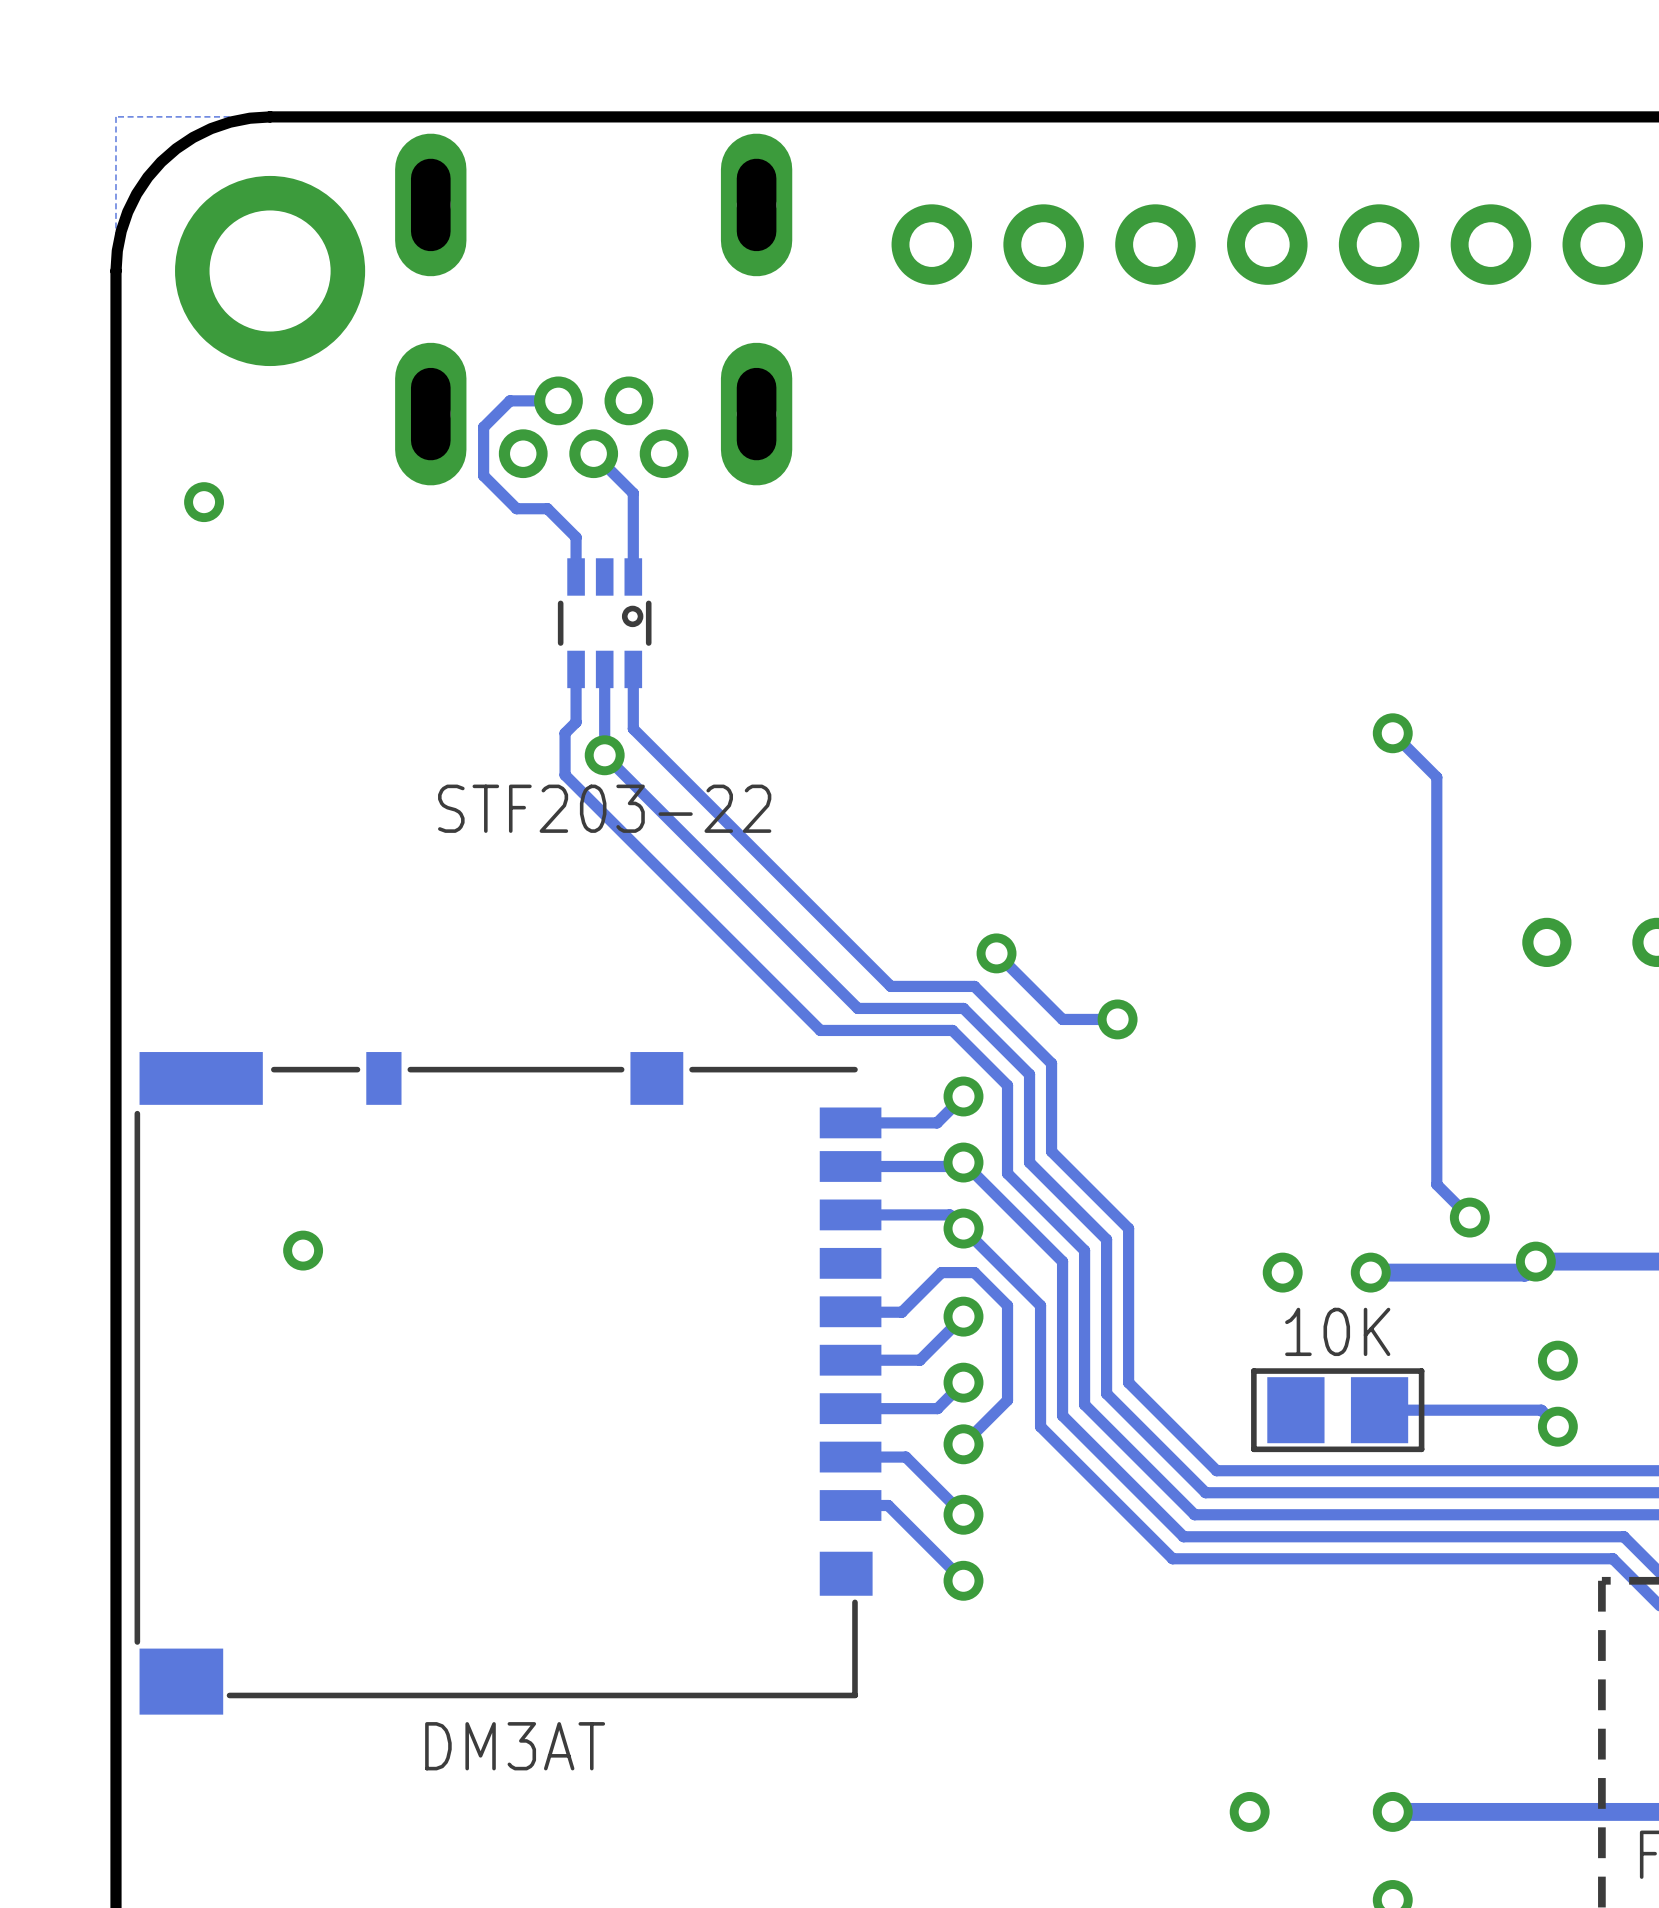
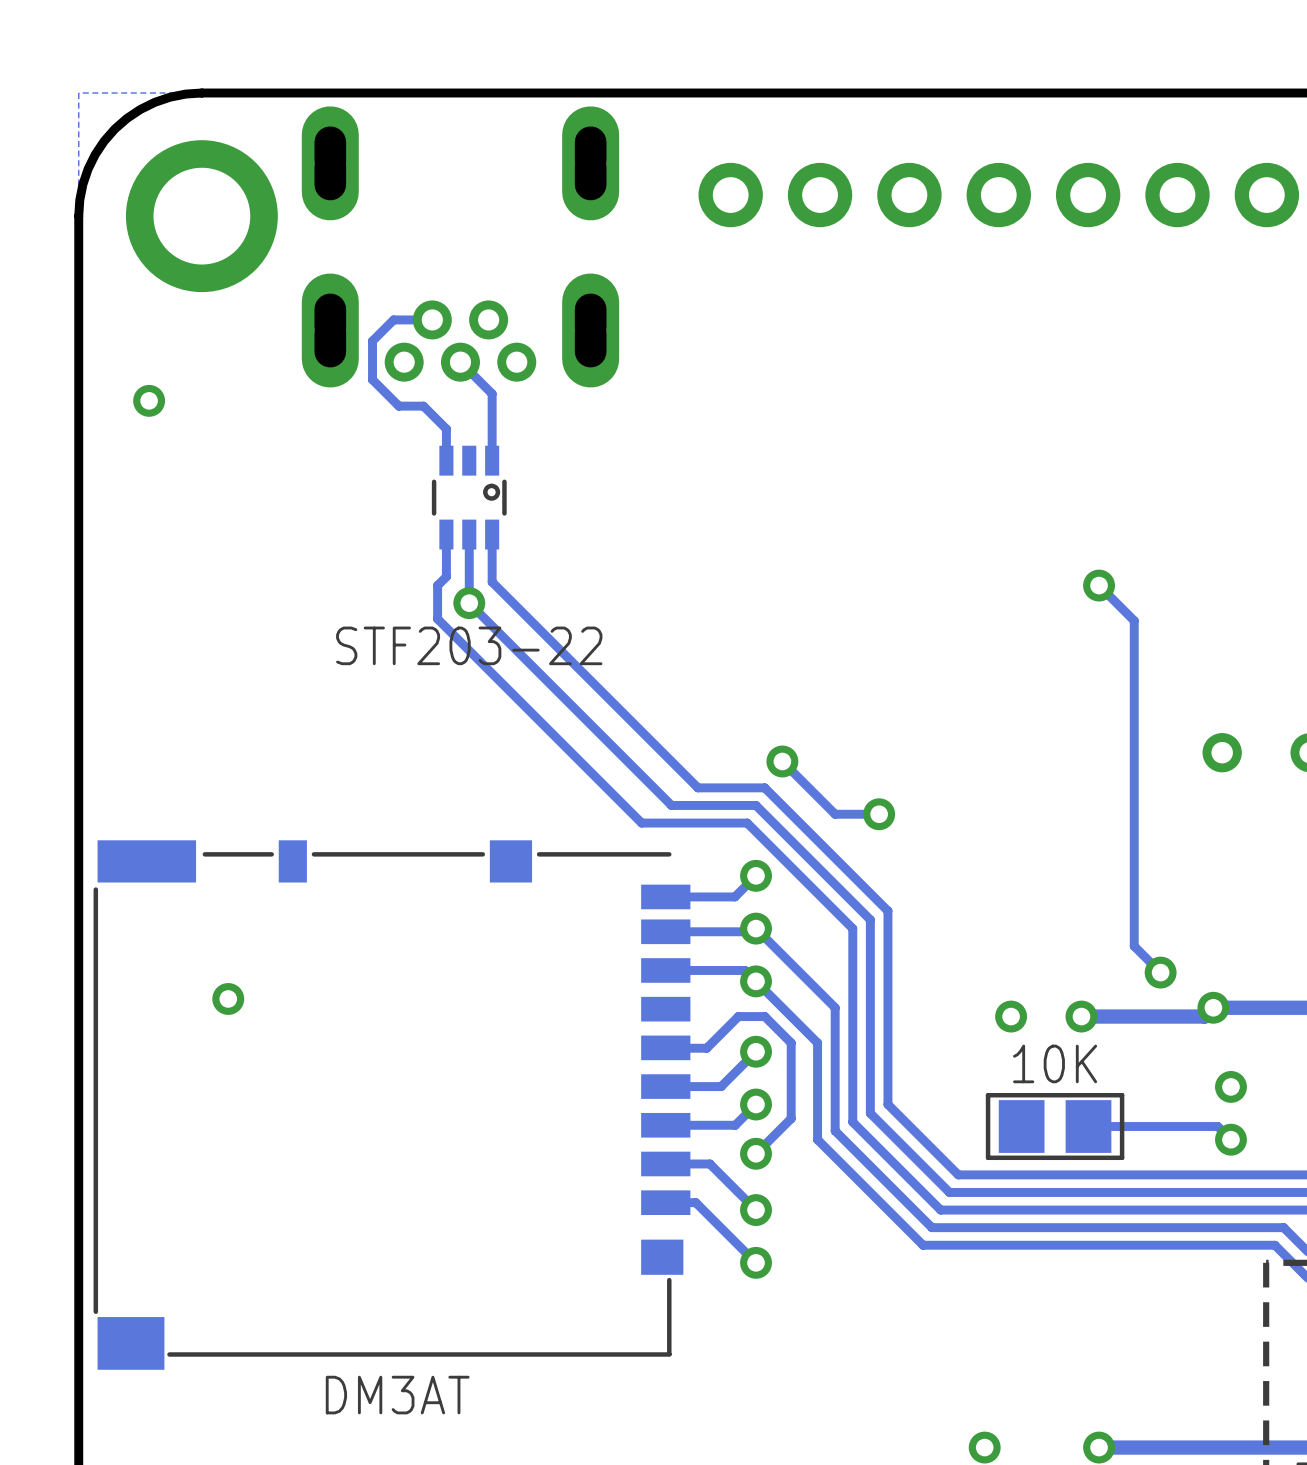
track: (1051, 1063) (1051, 1151) (1128, 1228) -> (826, 849) (887, 911) (887, 981)
track: (1029, 1074) (1029, 1162) (1106, 1239) -> (808, 858) (870, 919) (870, 990)
track: (1007, 1085) (1007, 1173) (1084, 1250) -> (791, 867) (852, 928) (852, 998)

